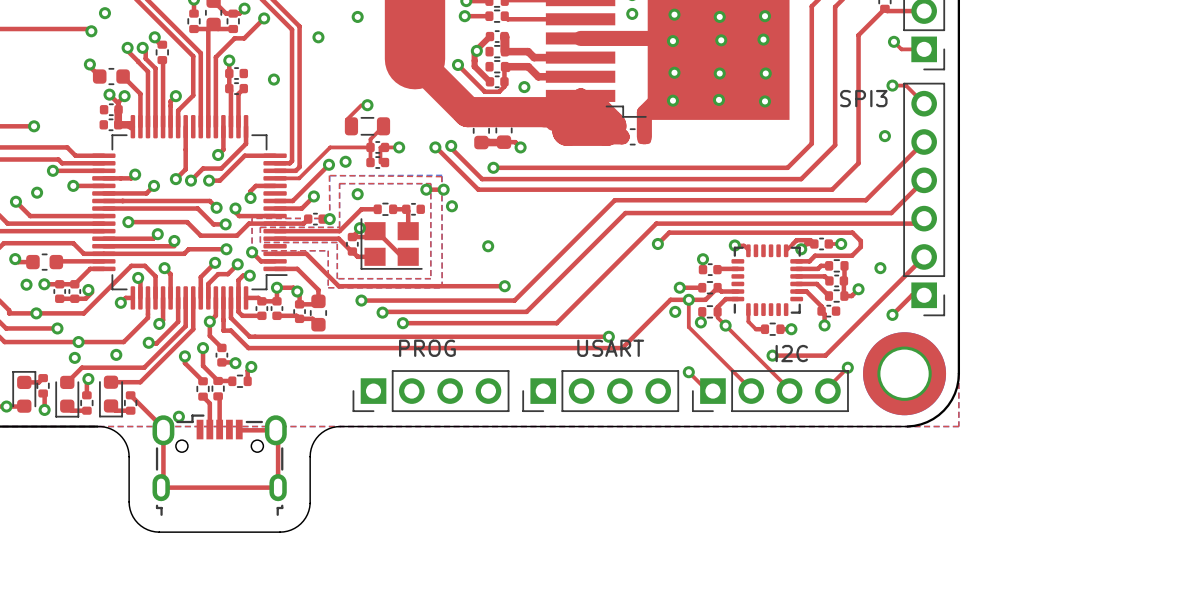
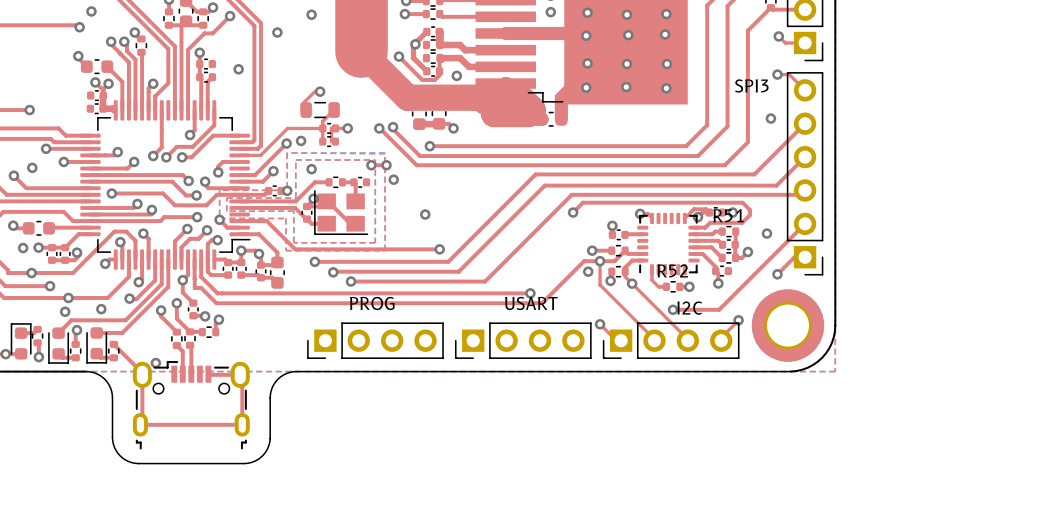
R51 name: none -> R51 (728, 215)
R52 name: none -> R52 (672, 270)

